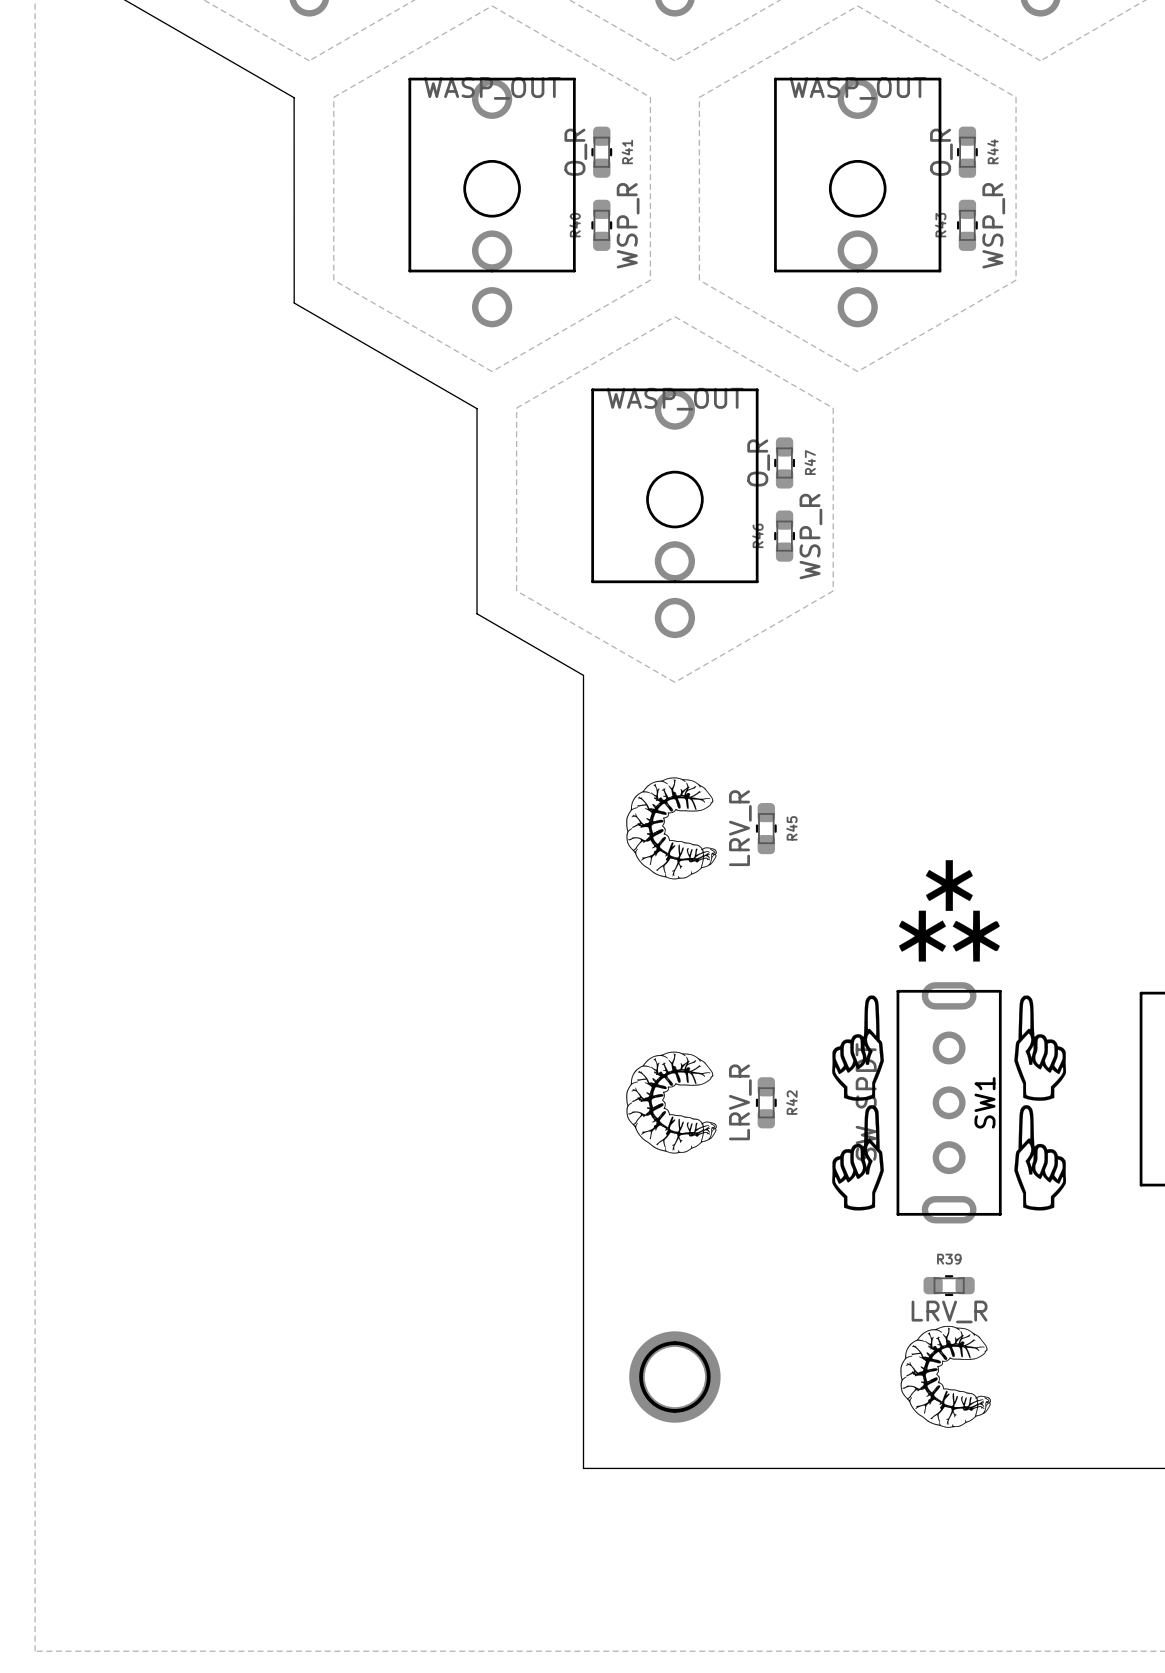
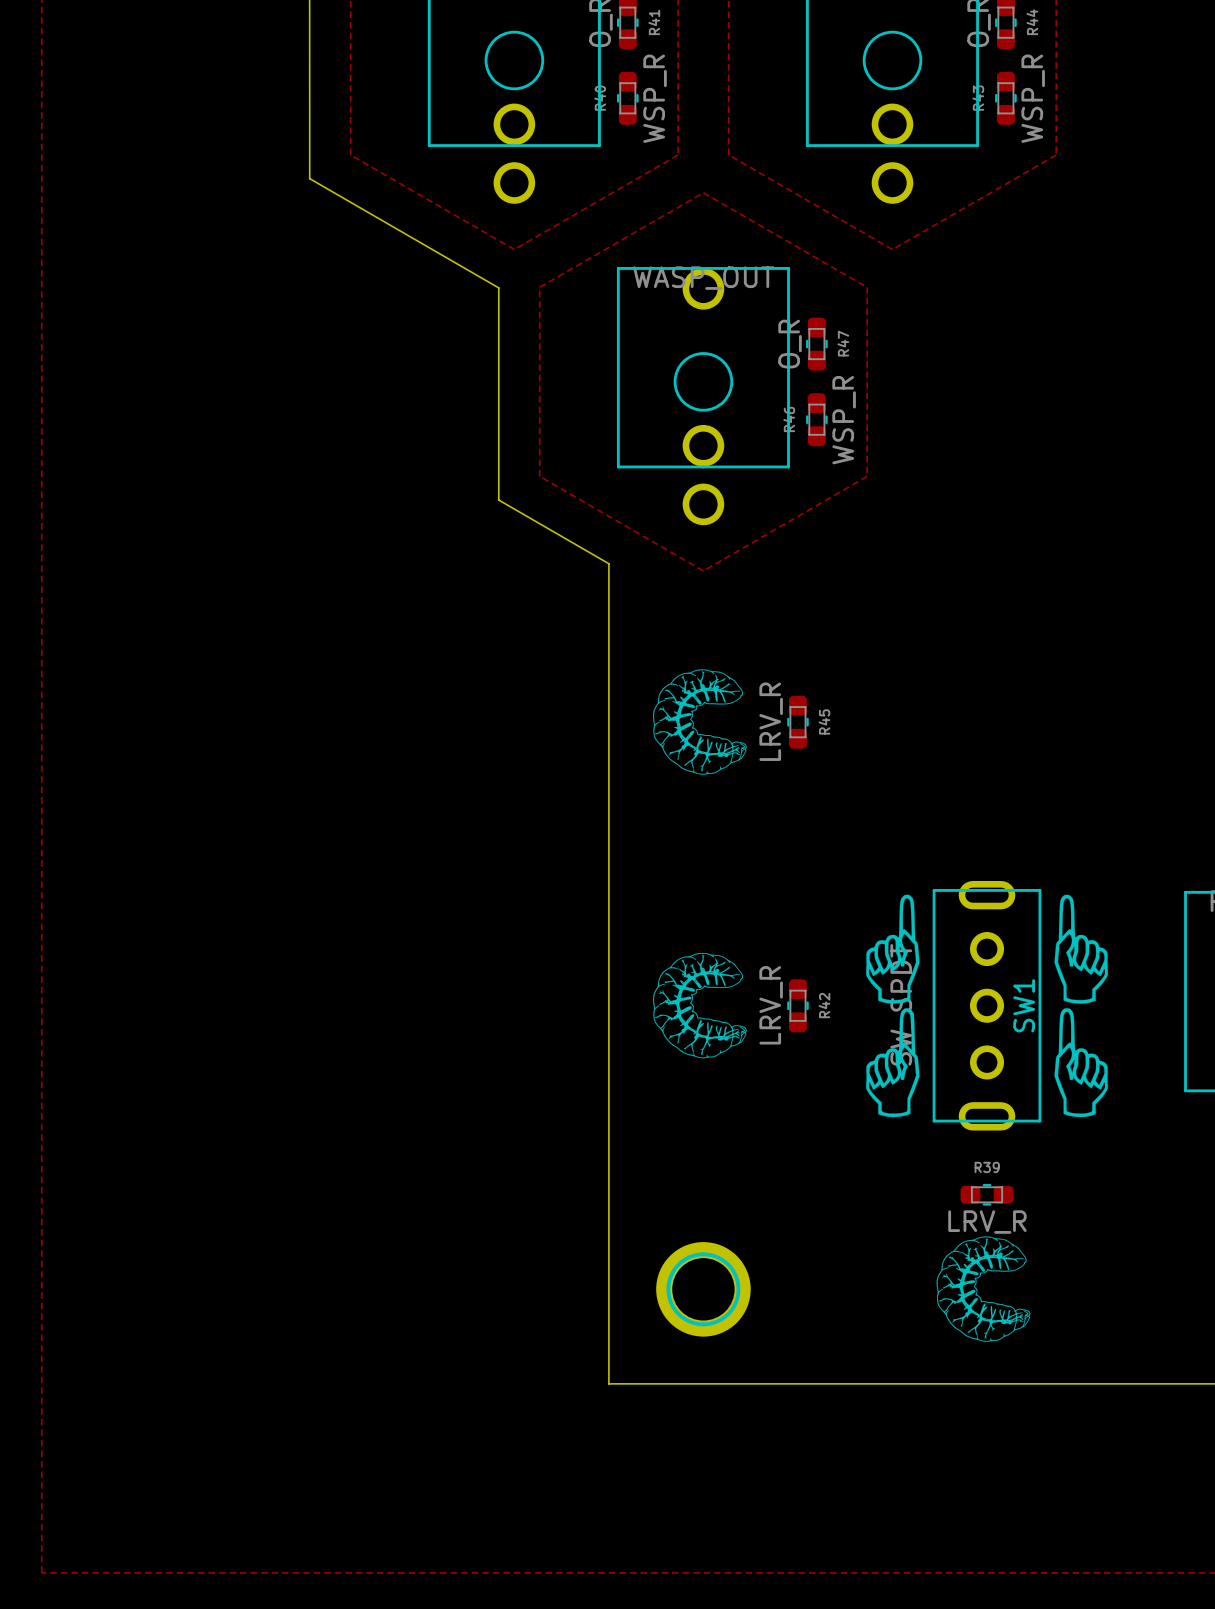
drawing: [899, 860, 1000, 962] -> none

